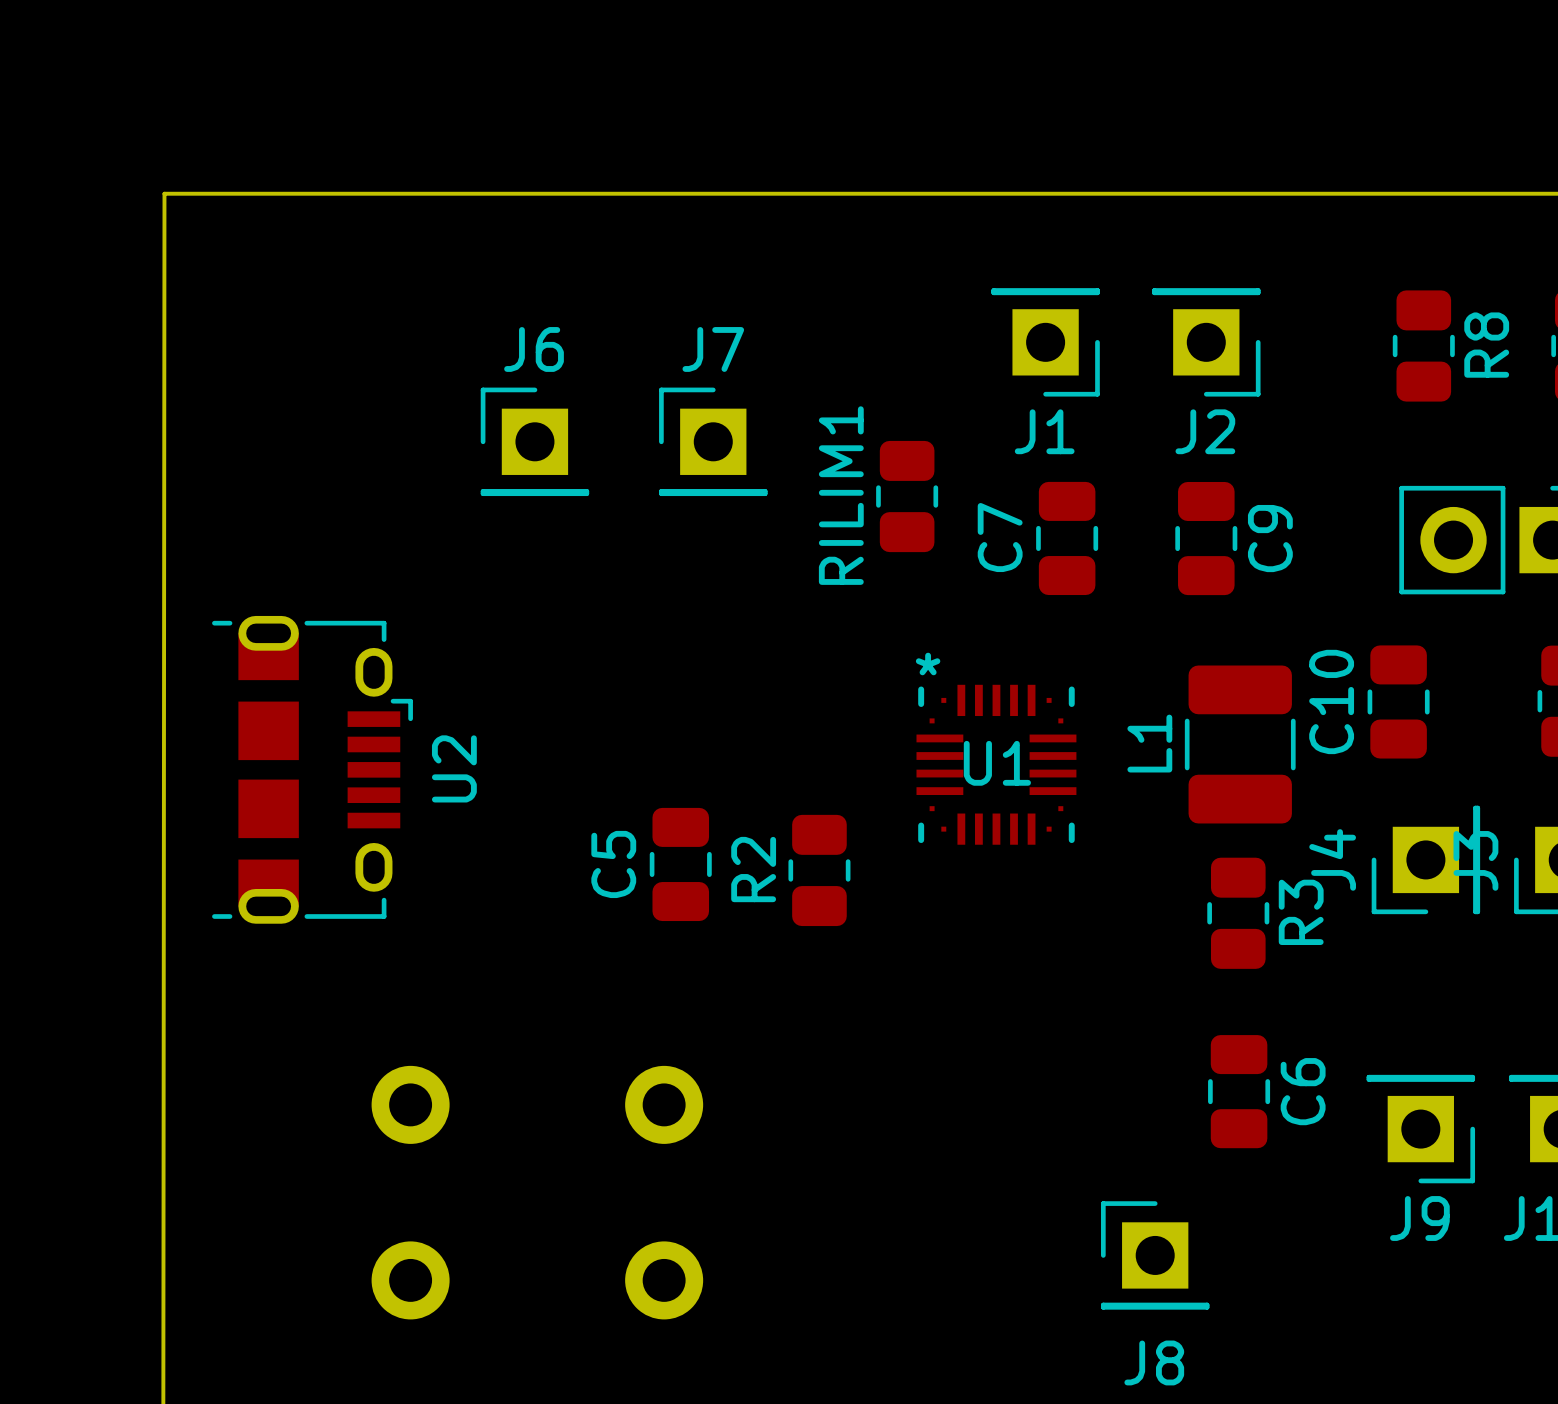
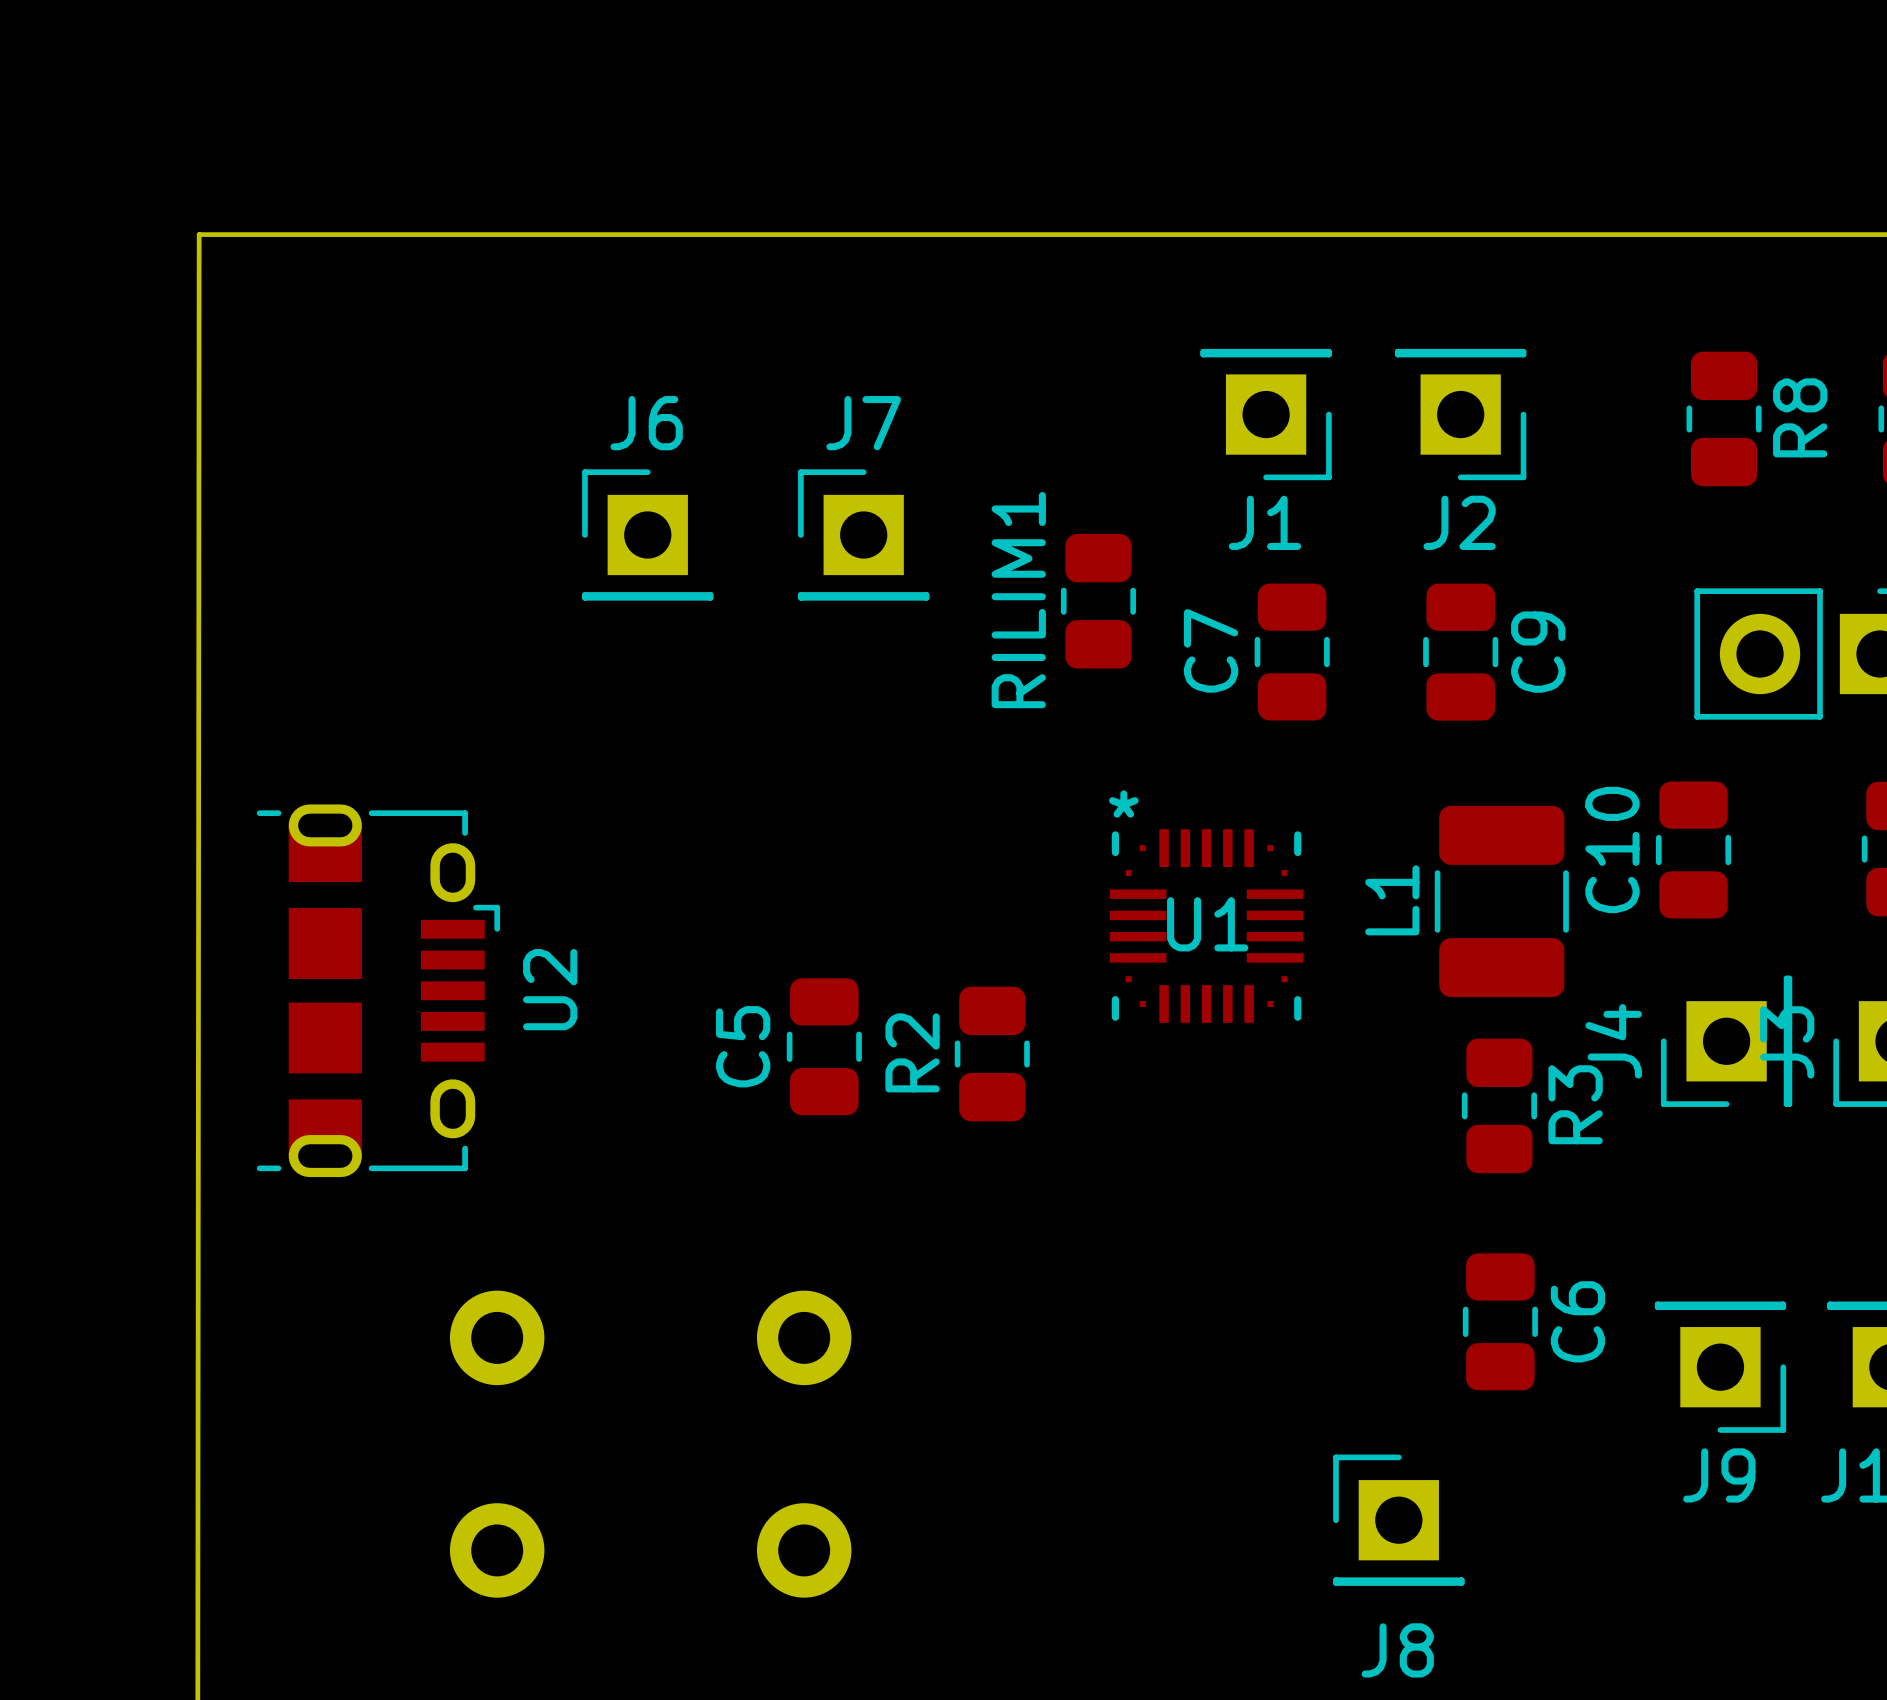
U2 position: (312, 769) -> (378, 990)

